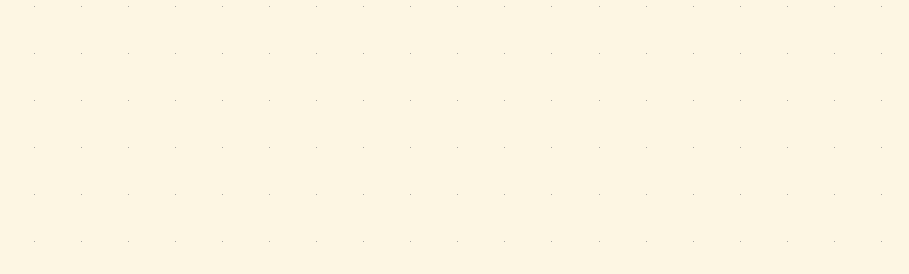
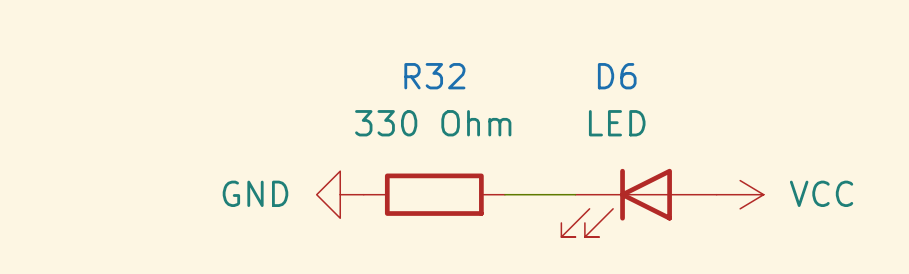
power symbol: none -> GND (340, 194)
R32: none -> 330 Ohm (434, 194)
wire: none -> (504, 194) (575, 194)
power symbol: none -> VCC (740, 194)
D6: none -> LED (639, 202)

